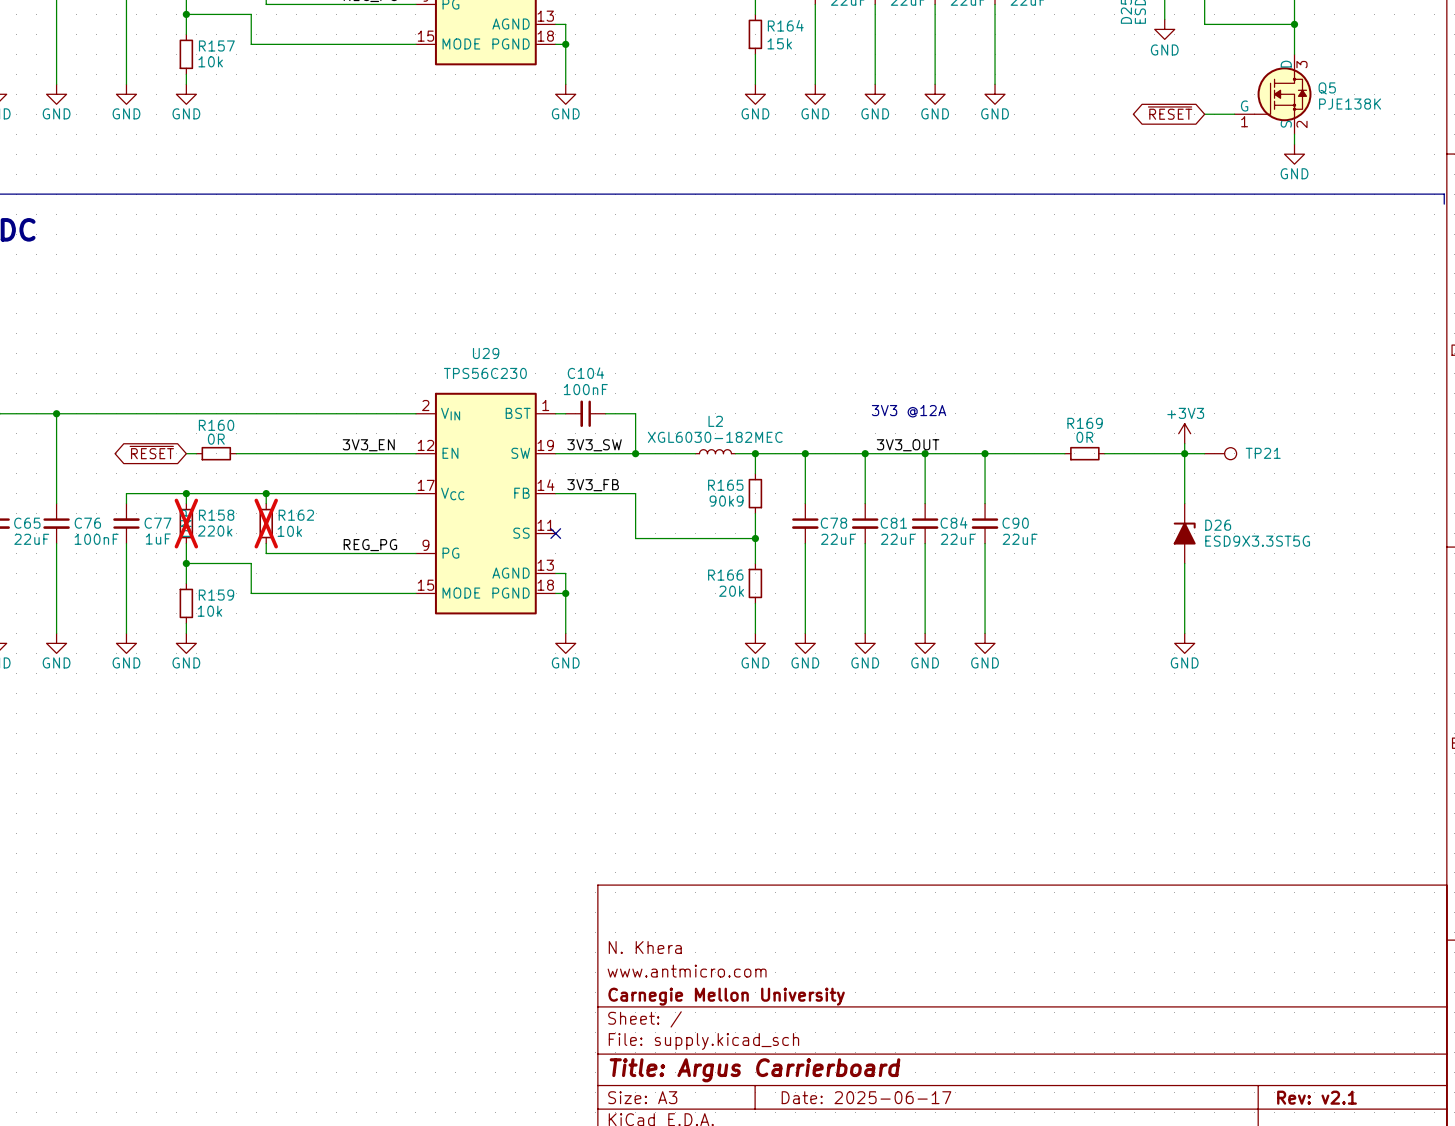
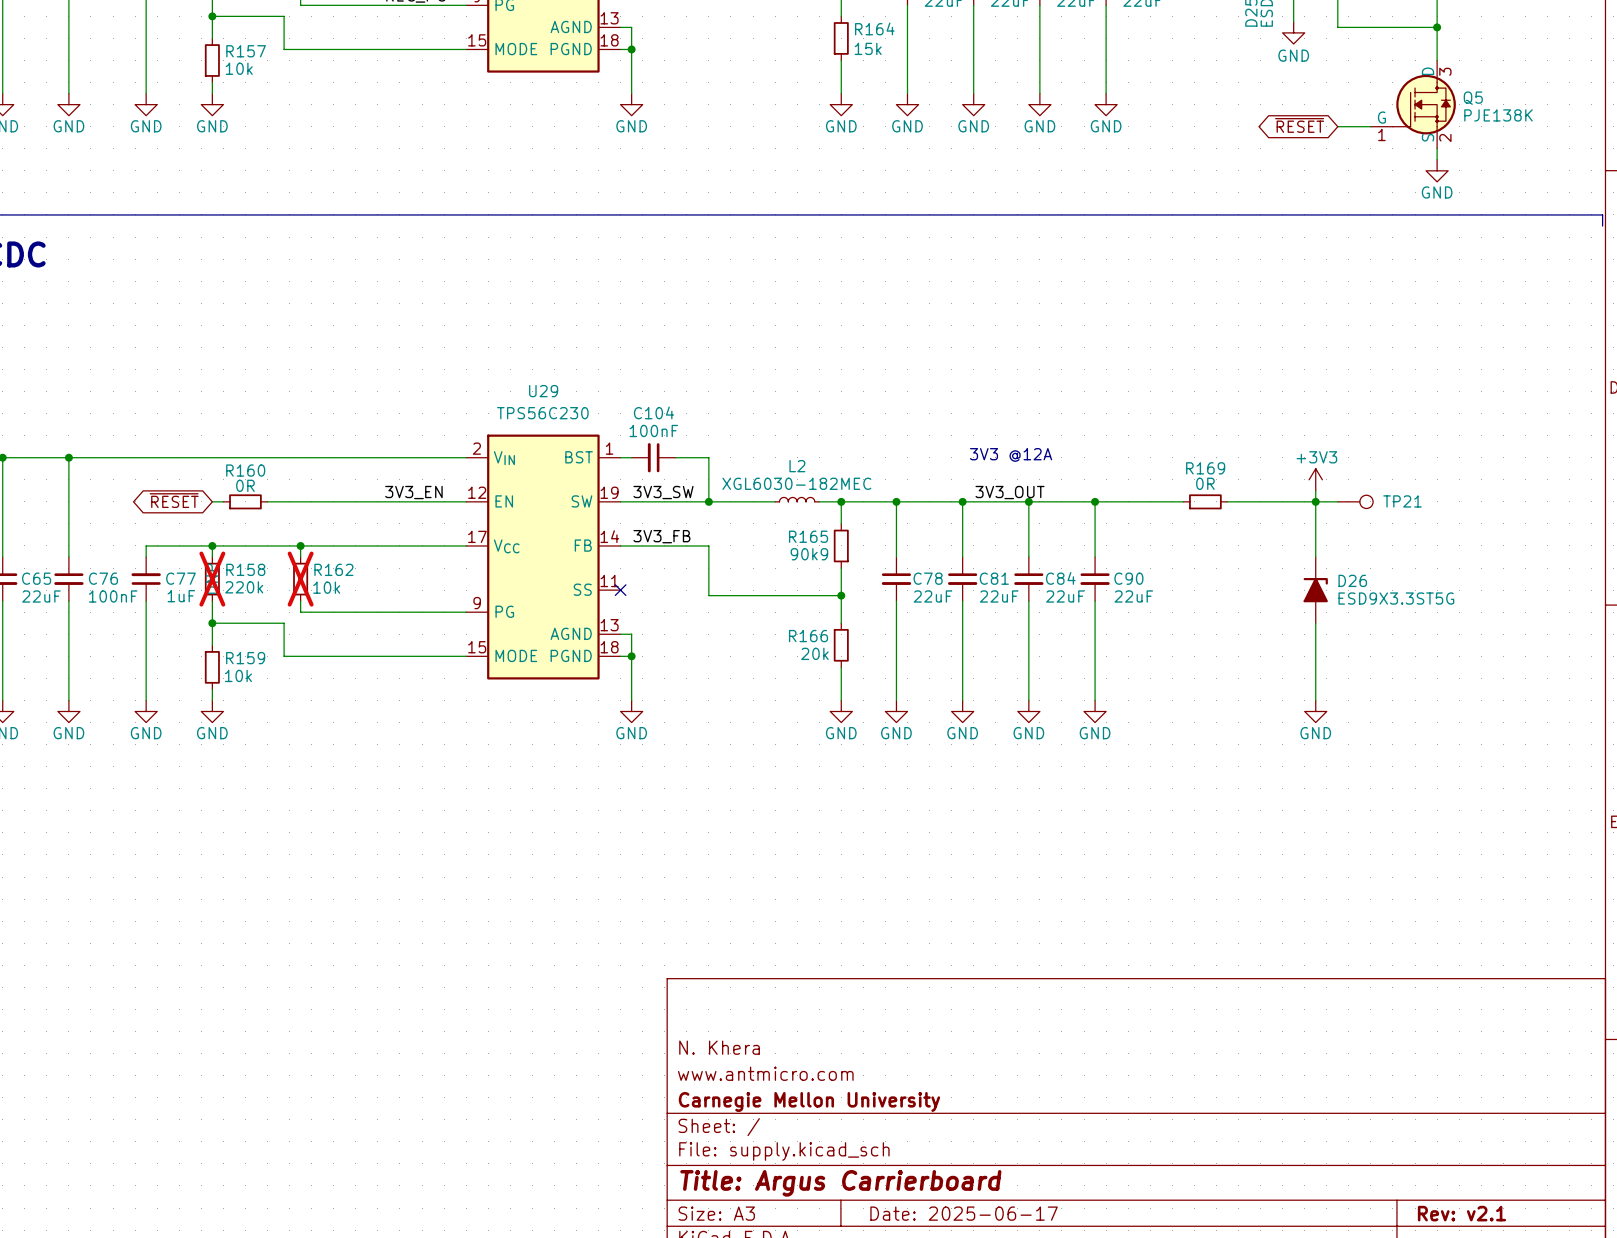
label: REG_PG (370, 545) -> none

